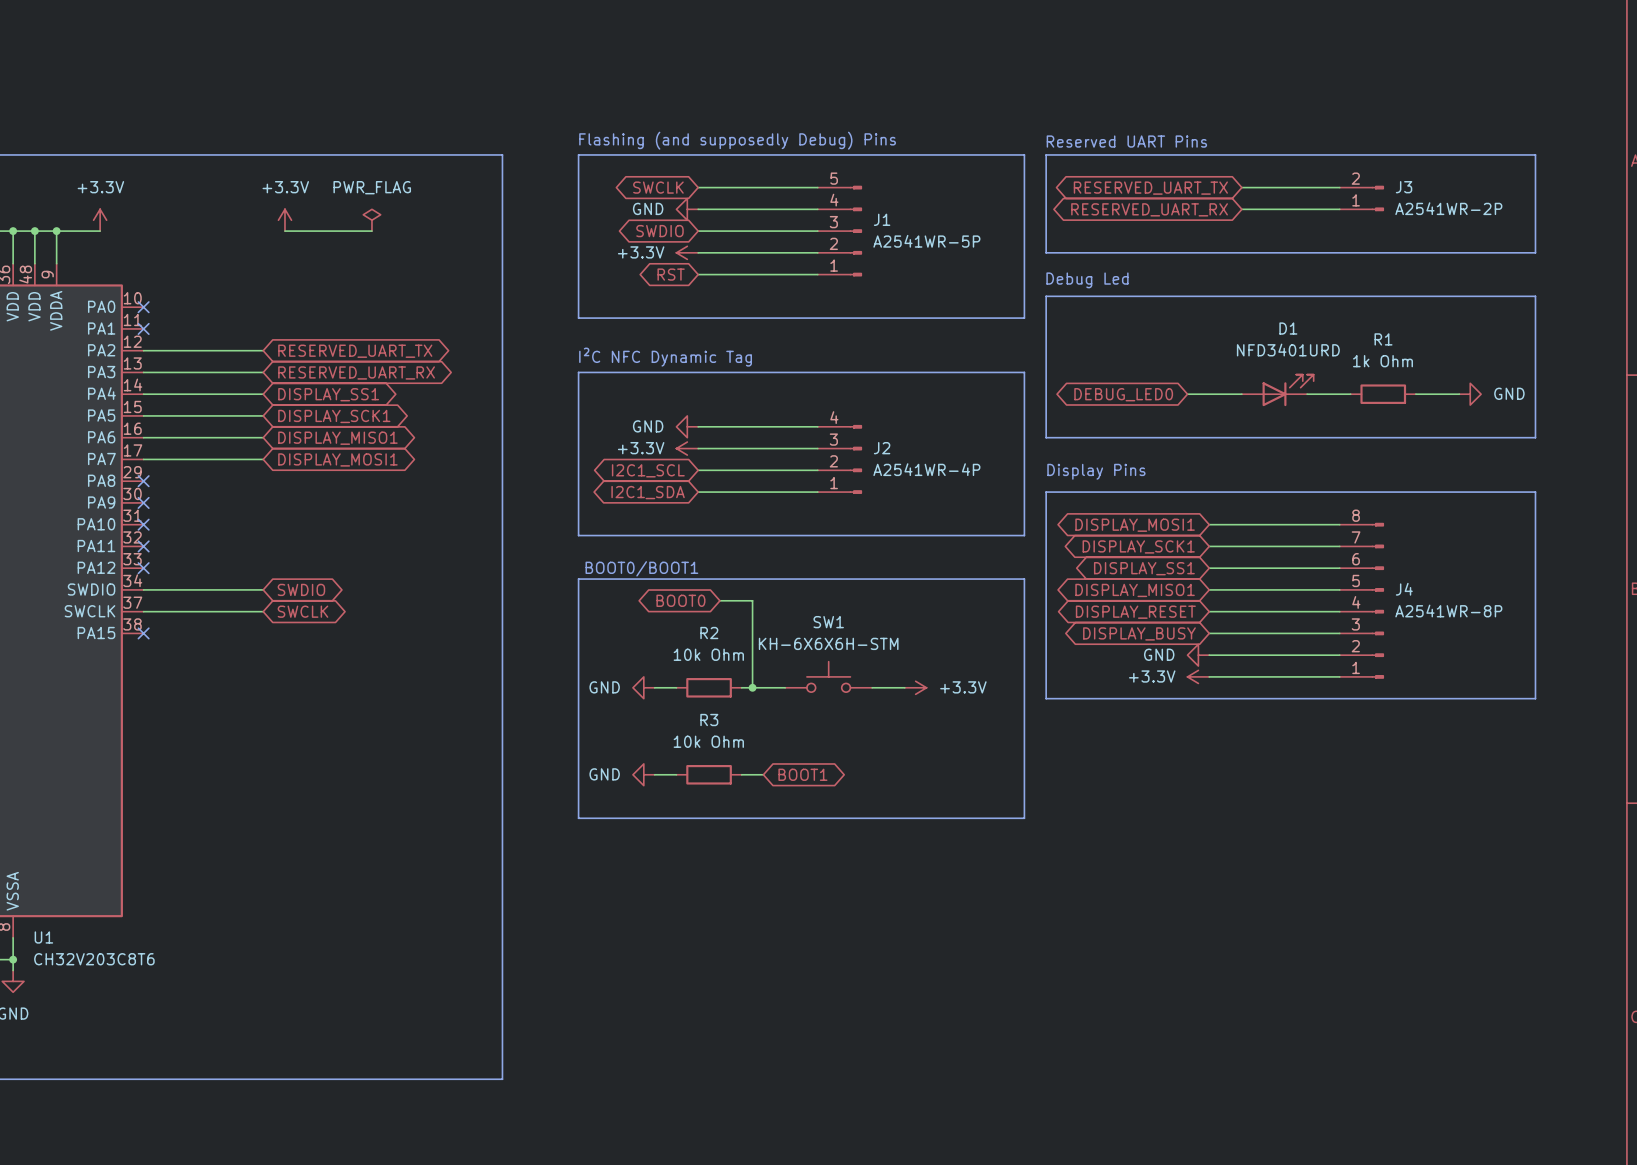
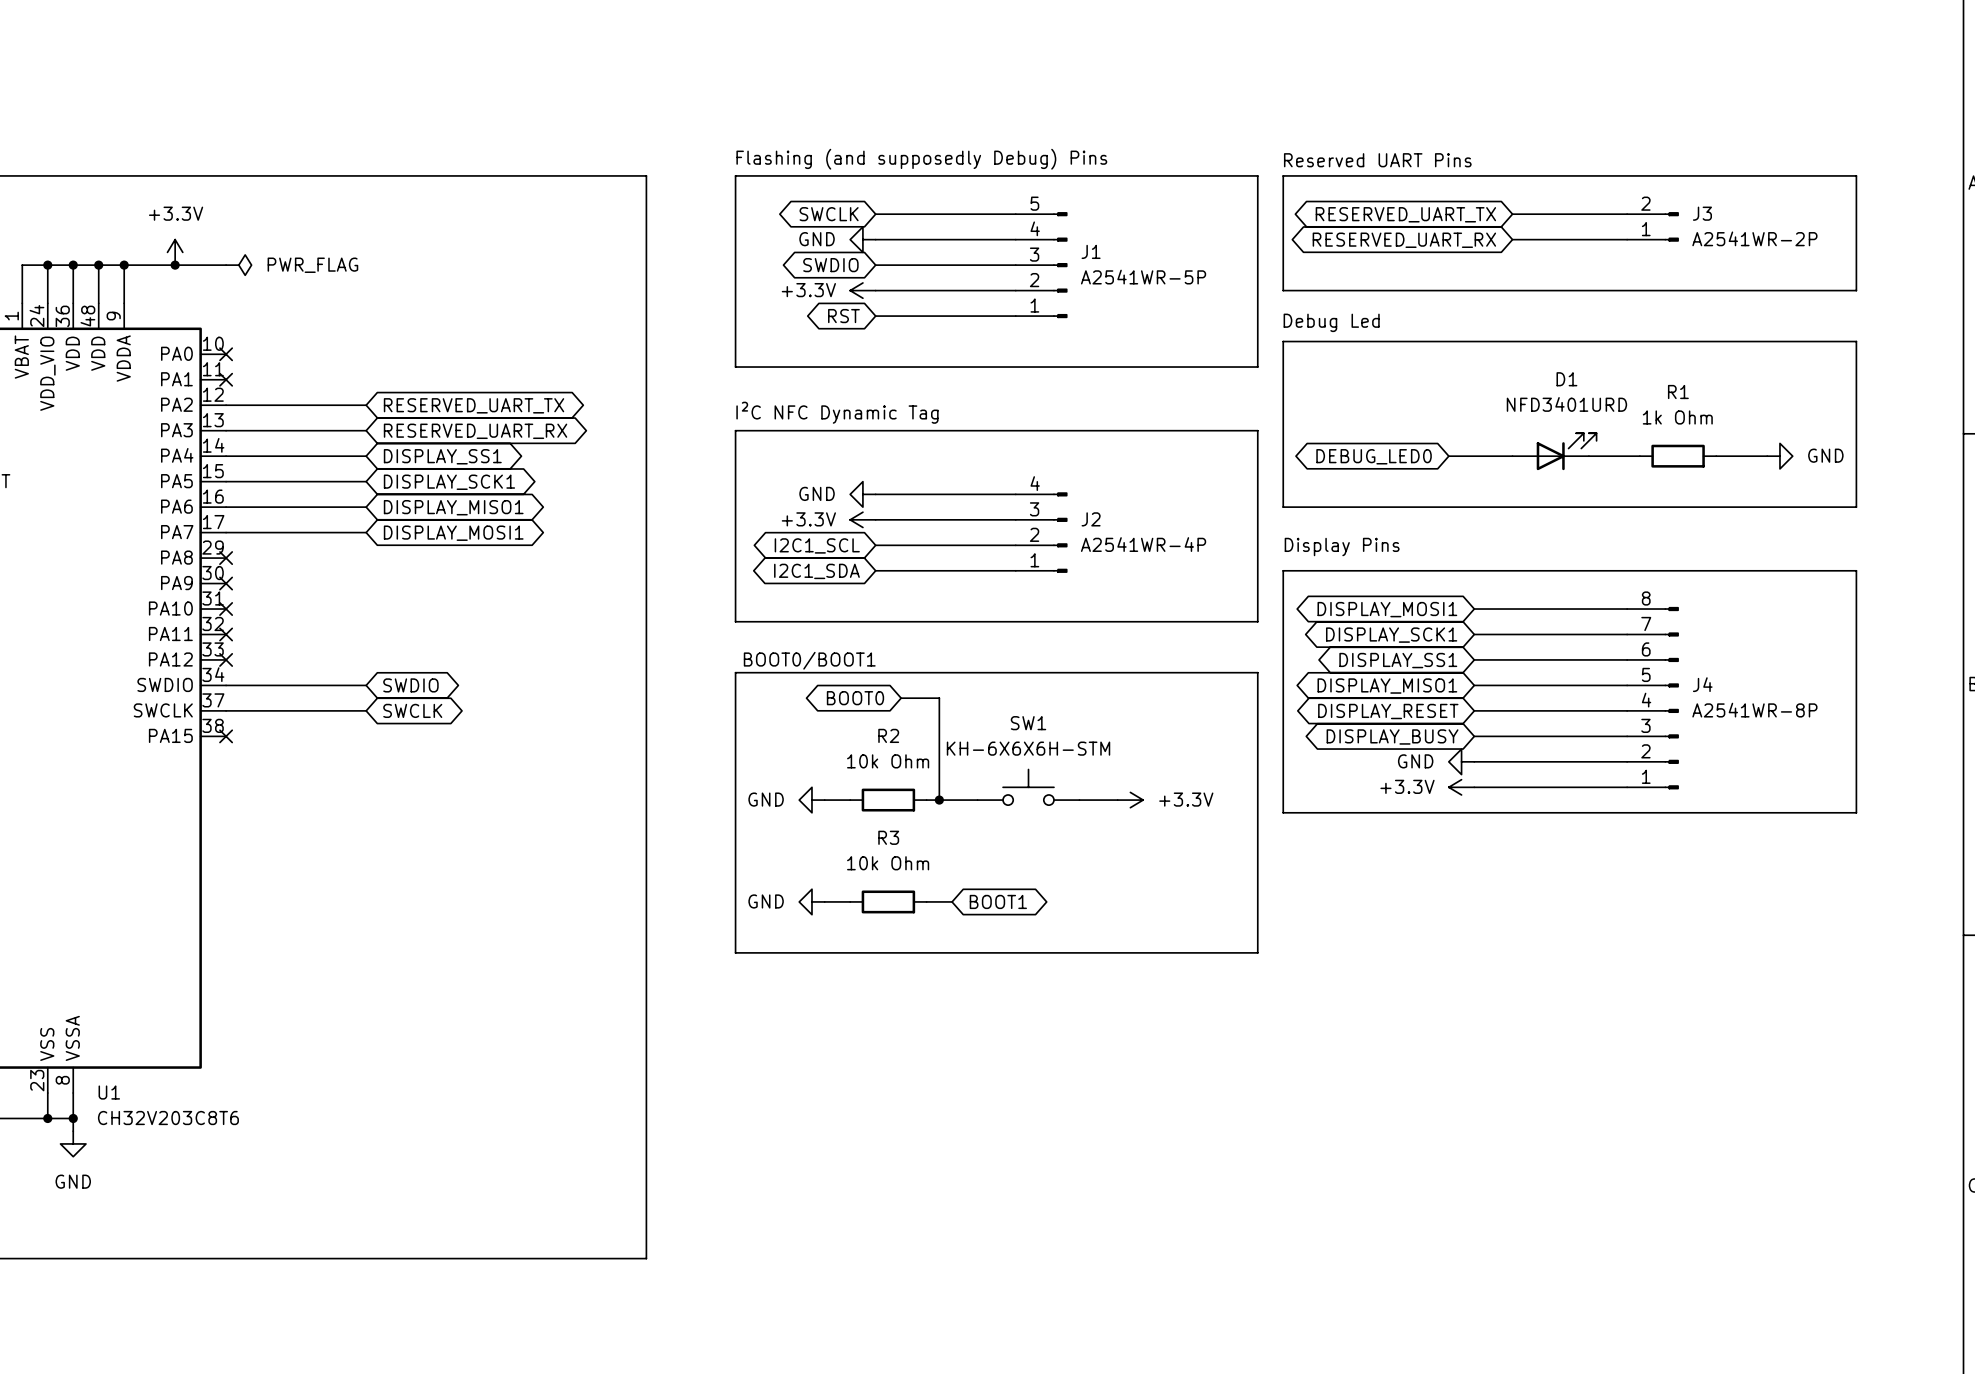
power symbol: +3.3V (284, 220) -> none
power symbol: PWR_FLAG (371, 220) -> none
wire: none -> (175, 265) (226, 265)
junction: none -> (175, 265)
power symbol: none -> PWR_FLAG (238, 265)
wire: (284, 231) (371, 231) -> none

